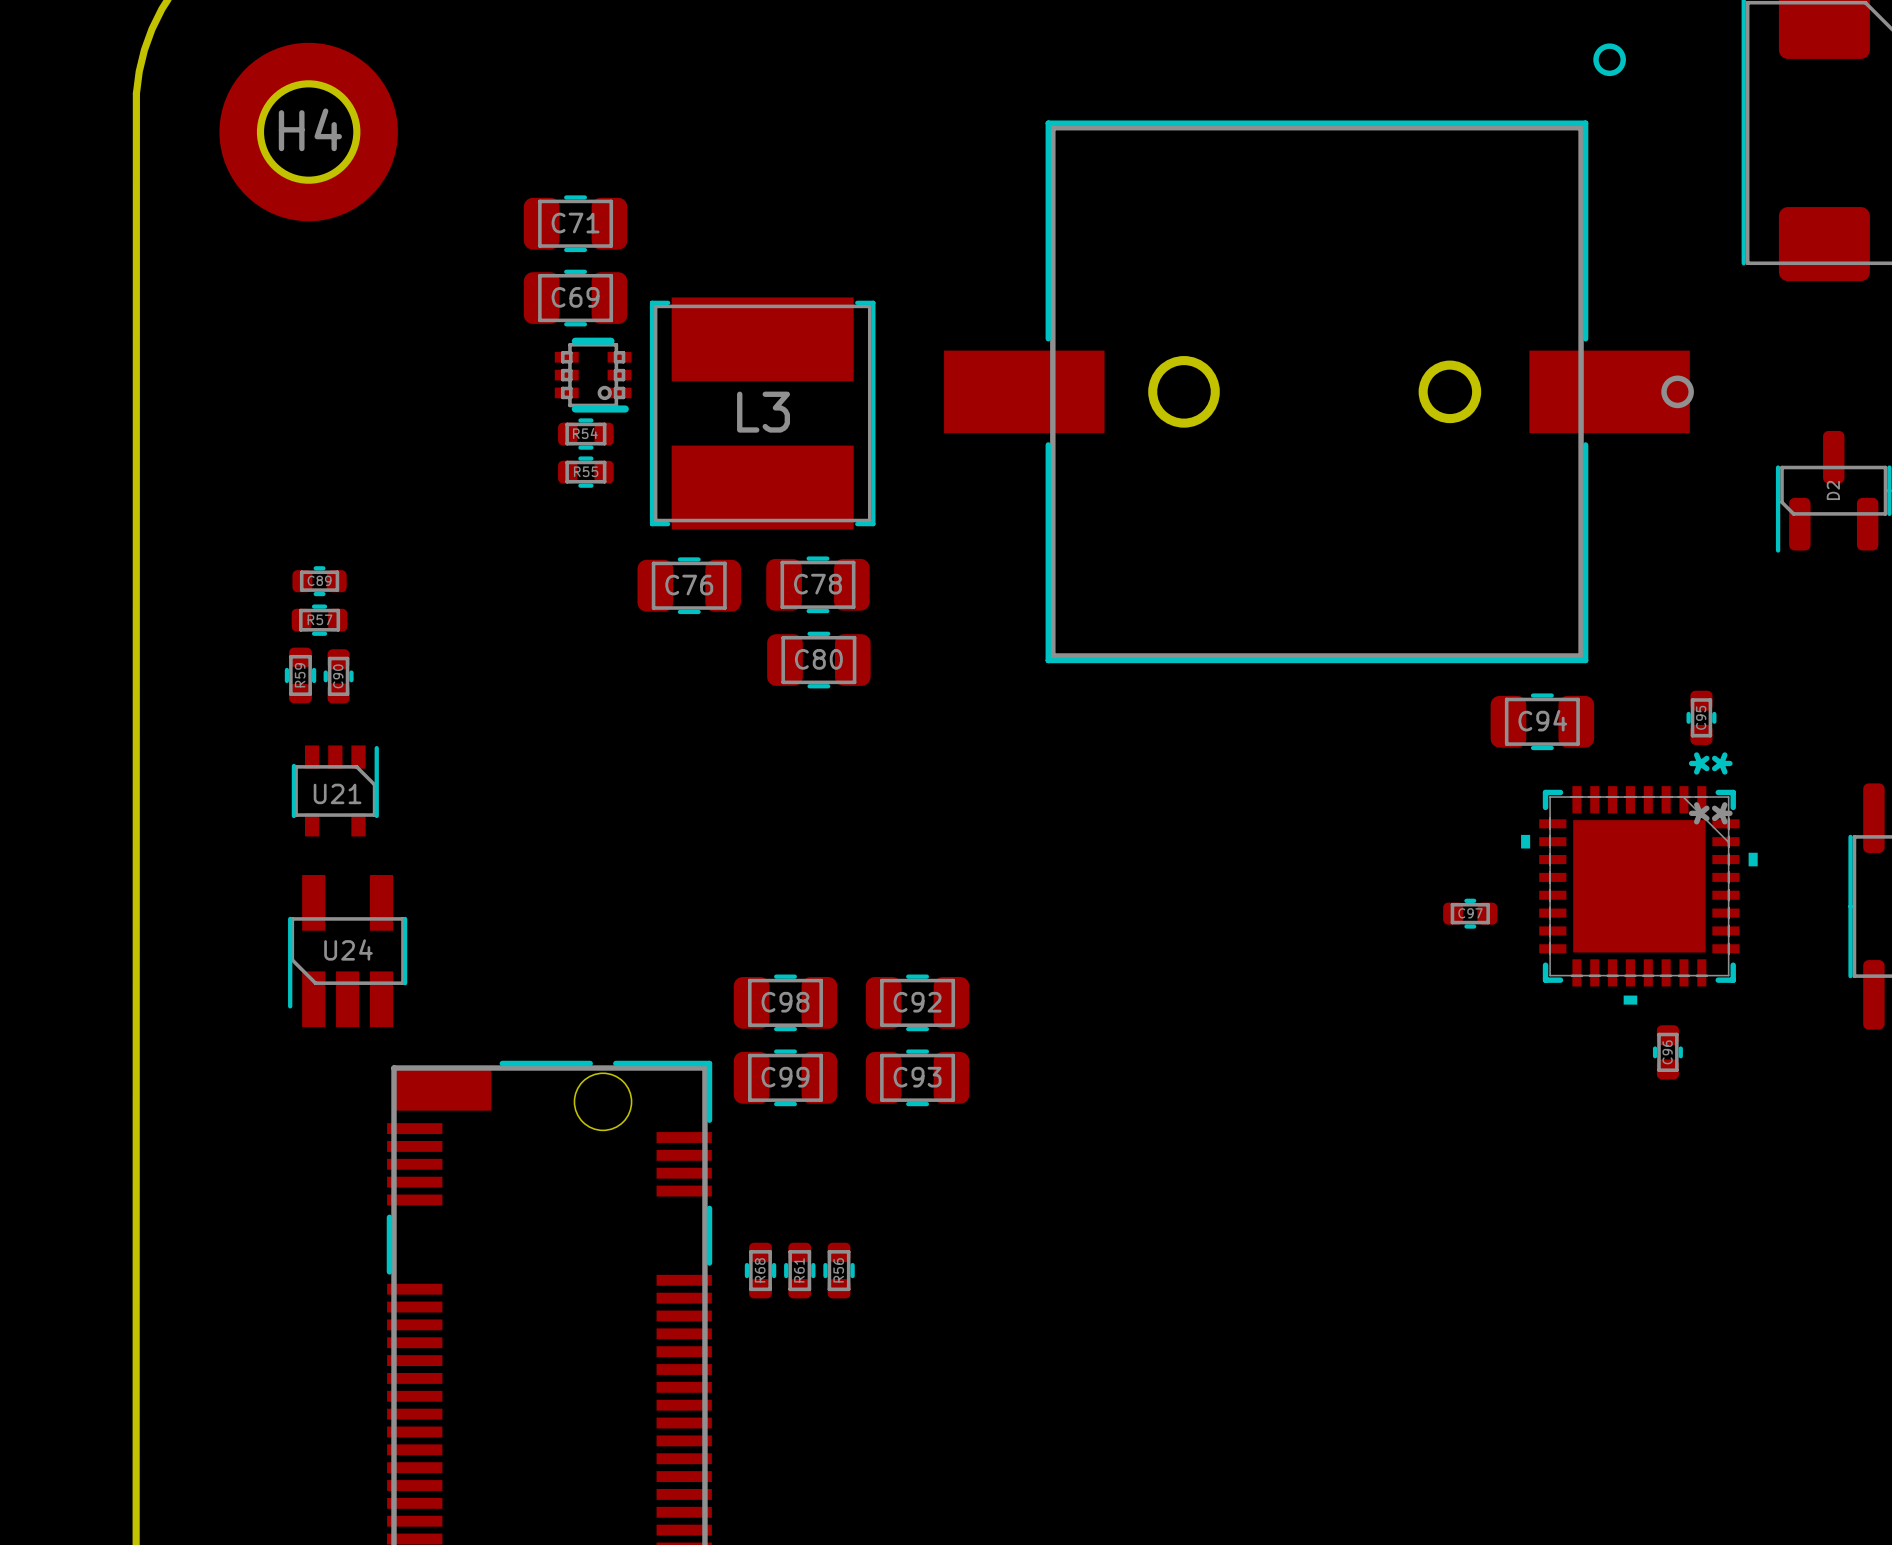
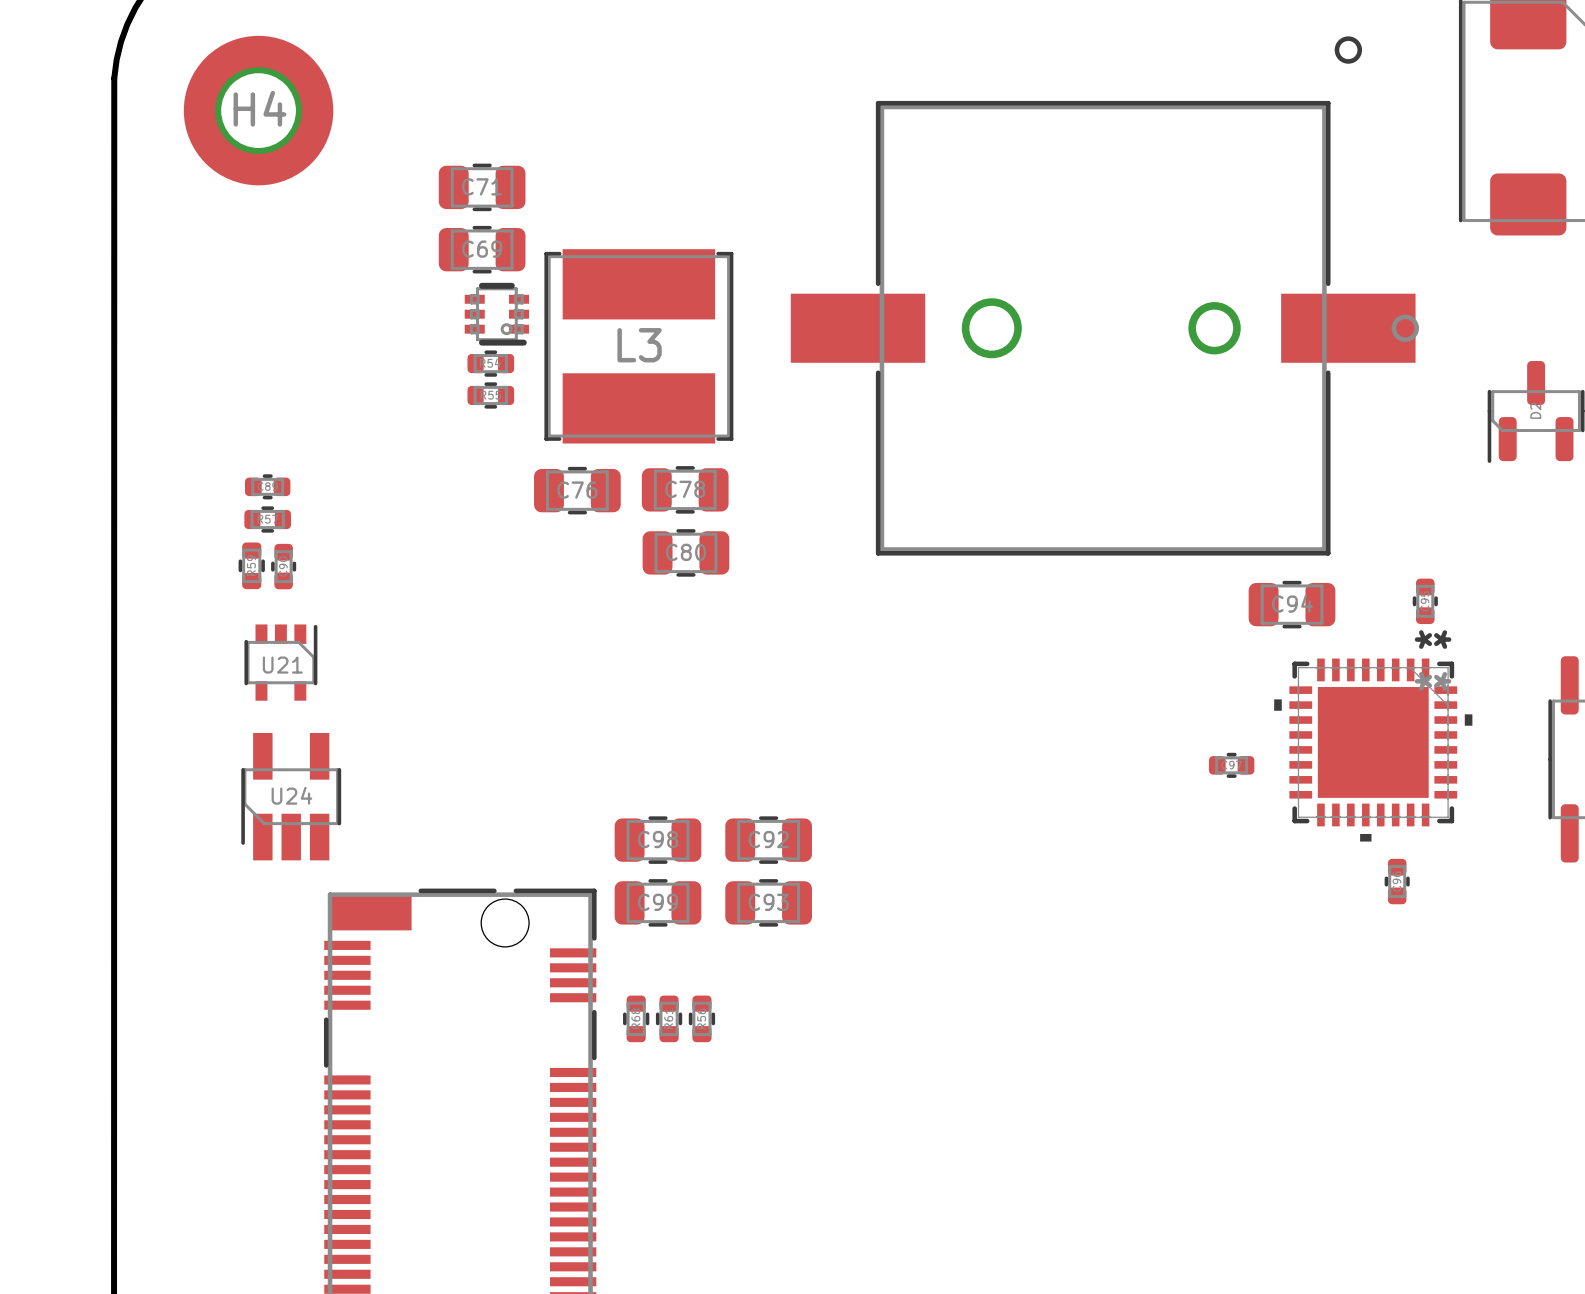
R68 position: (760, 1270) -> (636, 1018)
R61 position: (799, 1270) -> (669, 1018)
R56 position: (839, 1270) -> (701, 1018)

